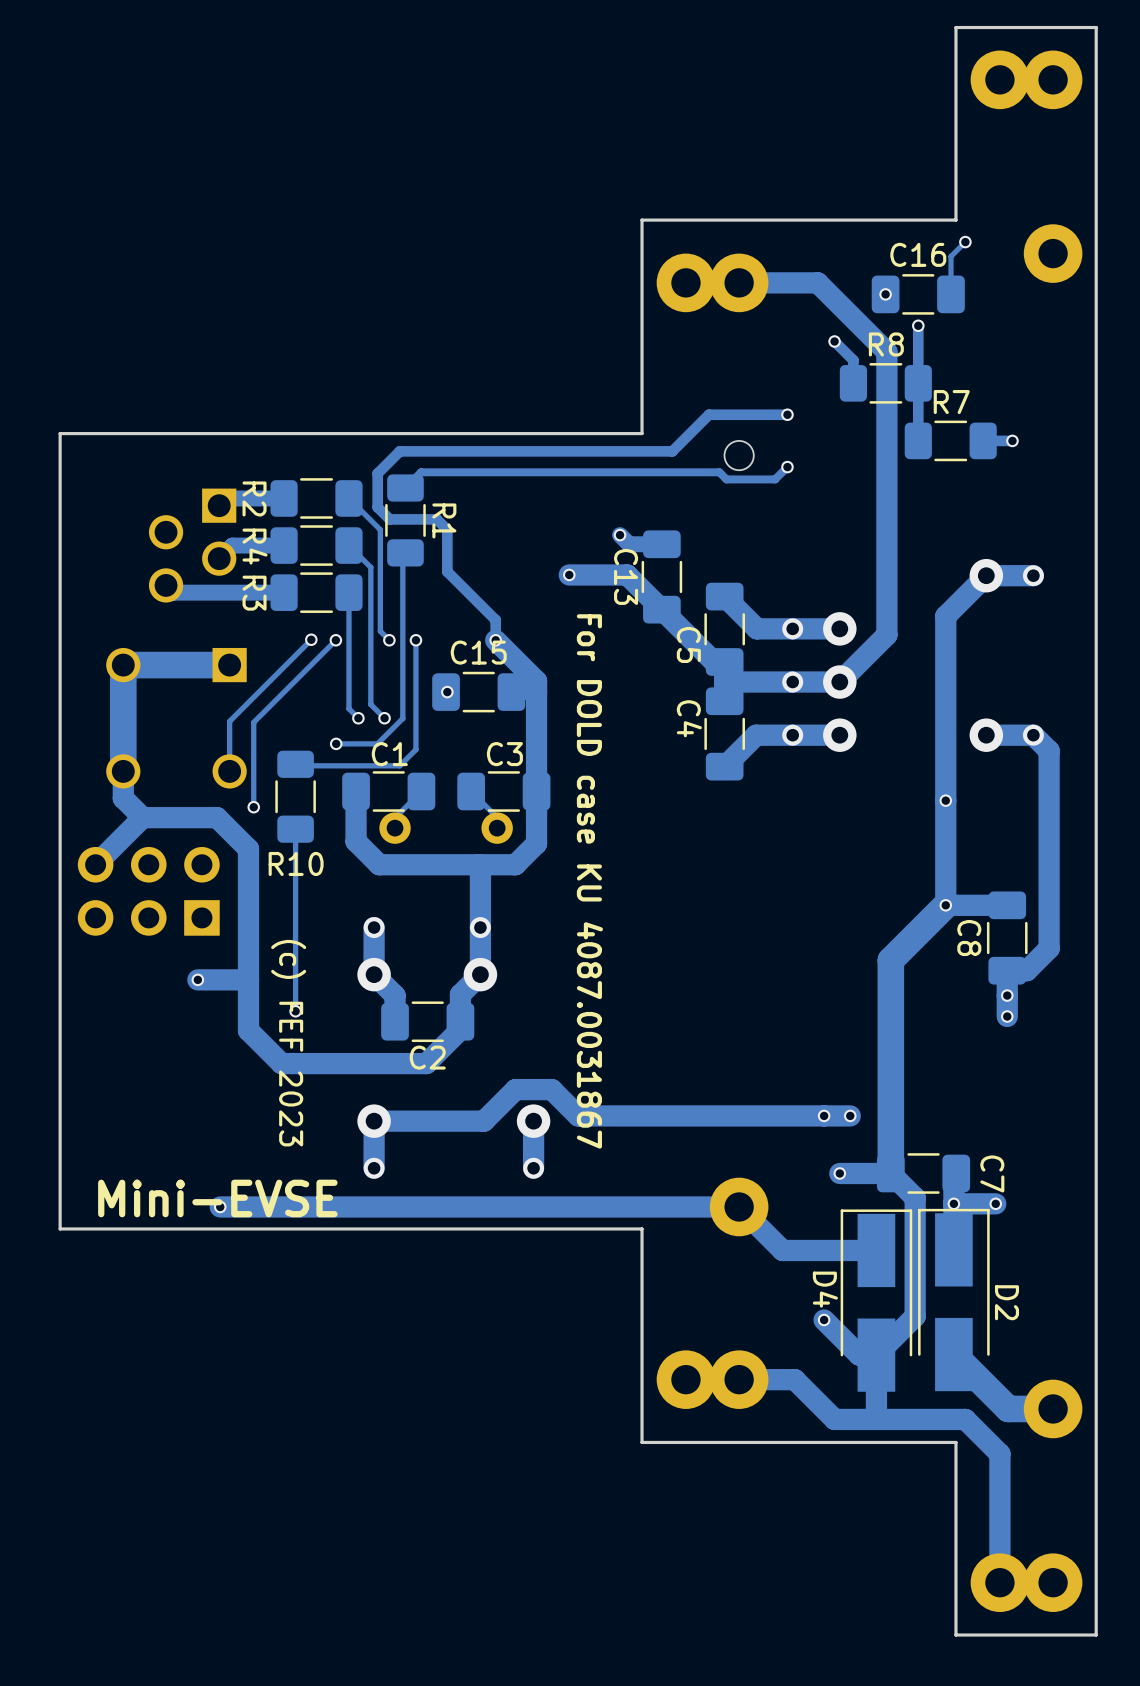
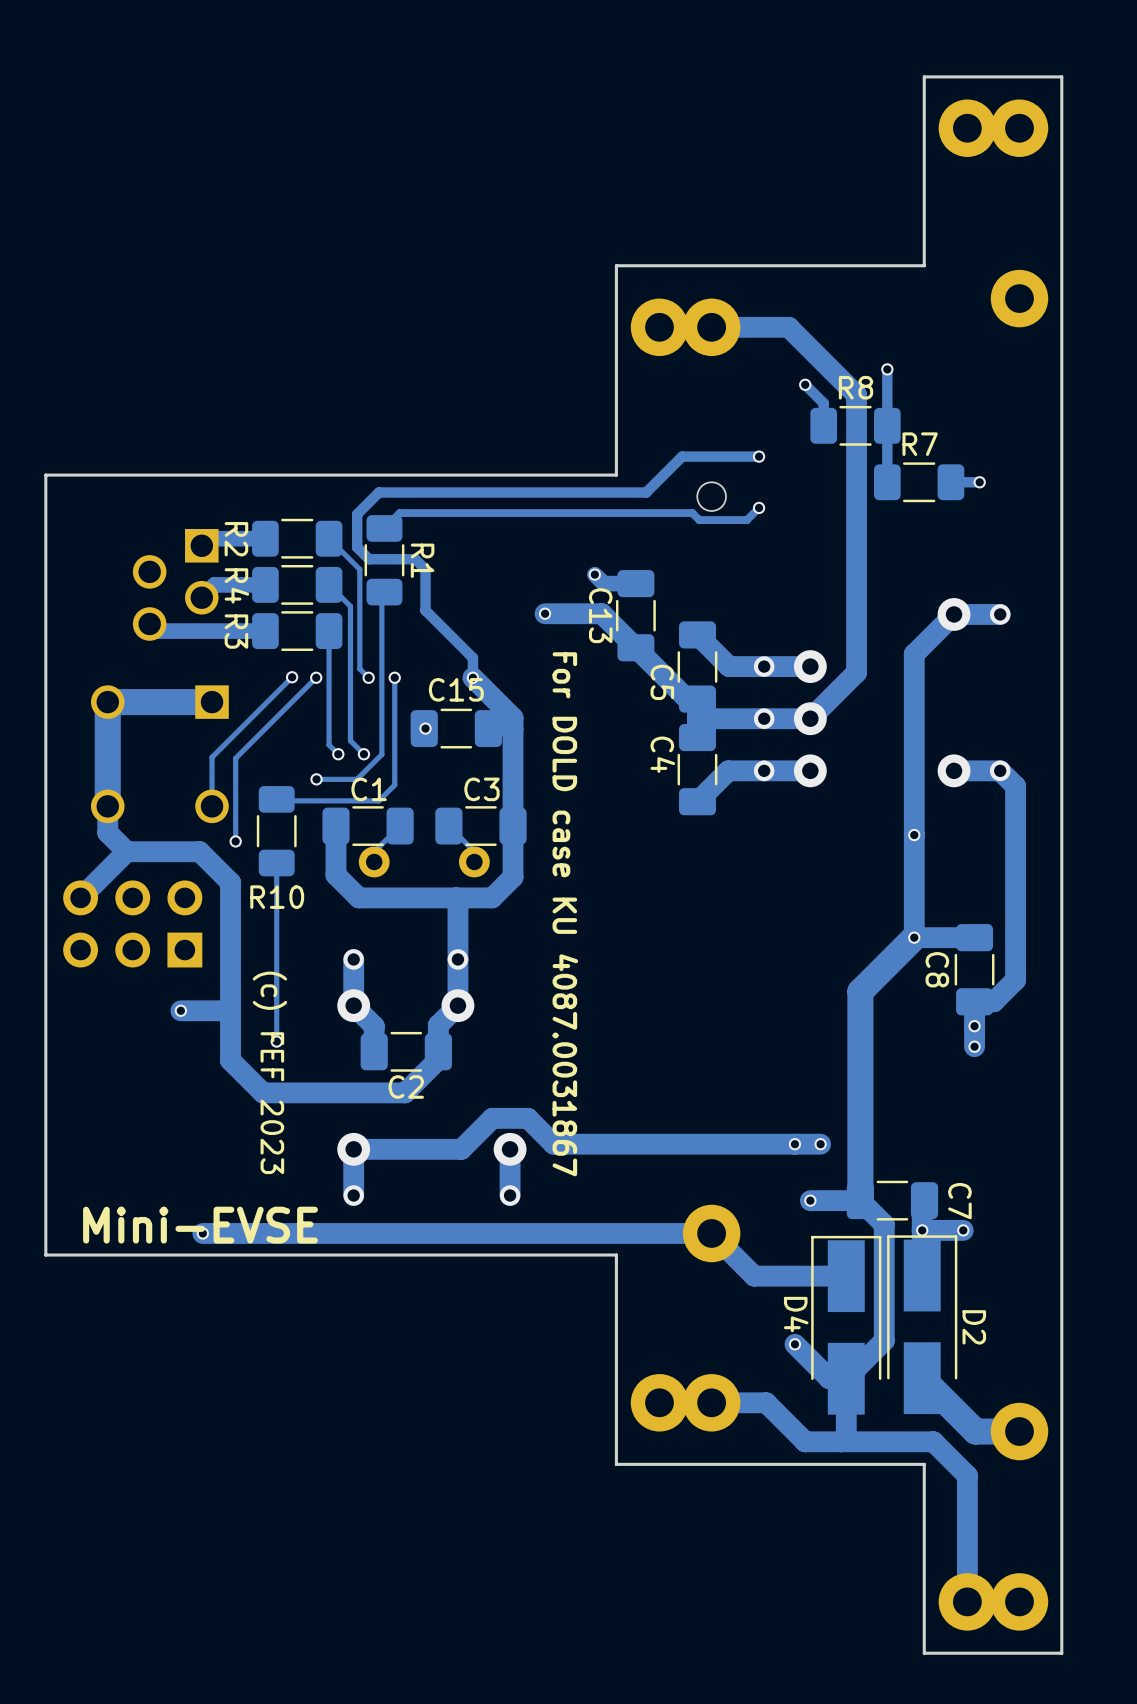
track: (965, 242) (951, 256) (951, 294) -> none
via: (965, 242) -> none
via: (885, 294) -> none
C16: (918, 294) -> none

